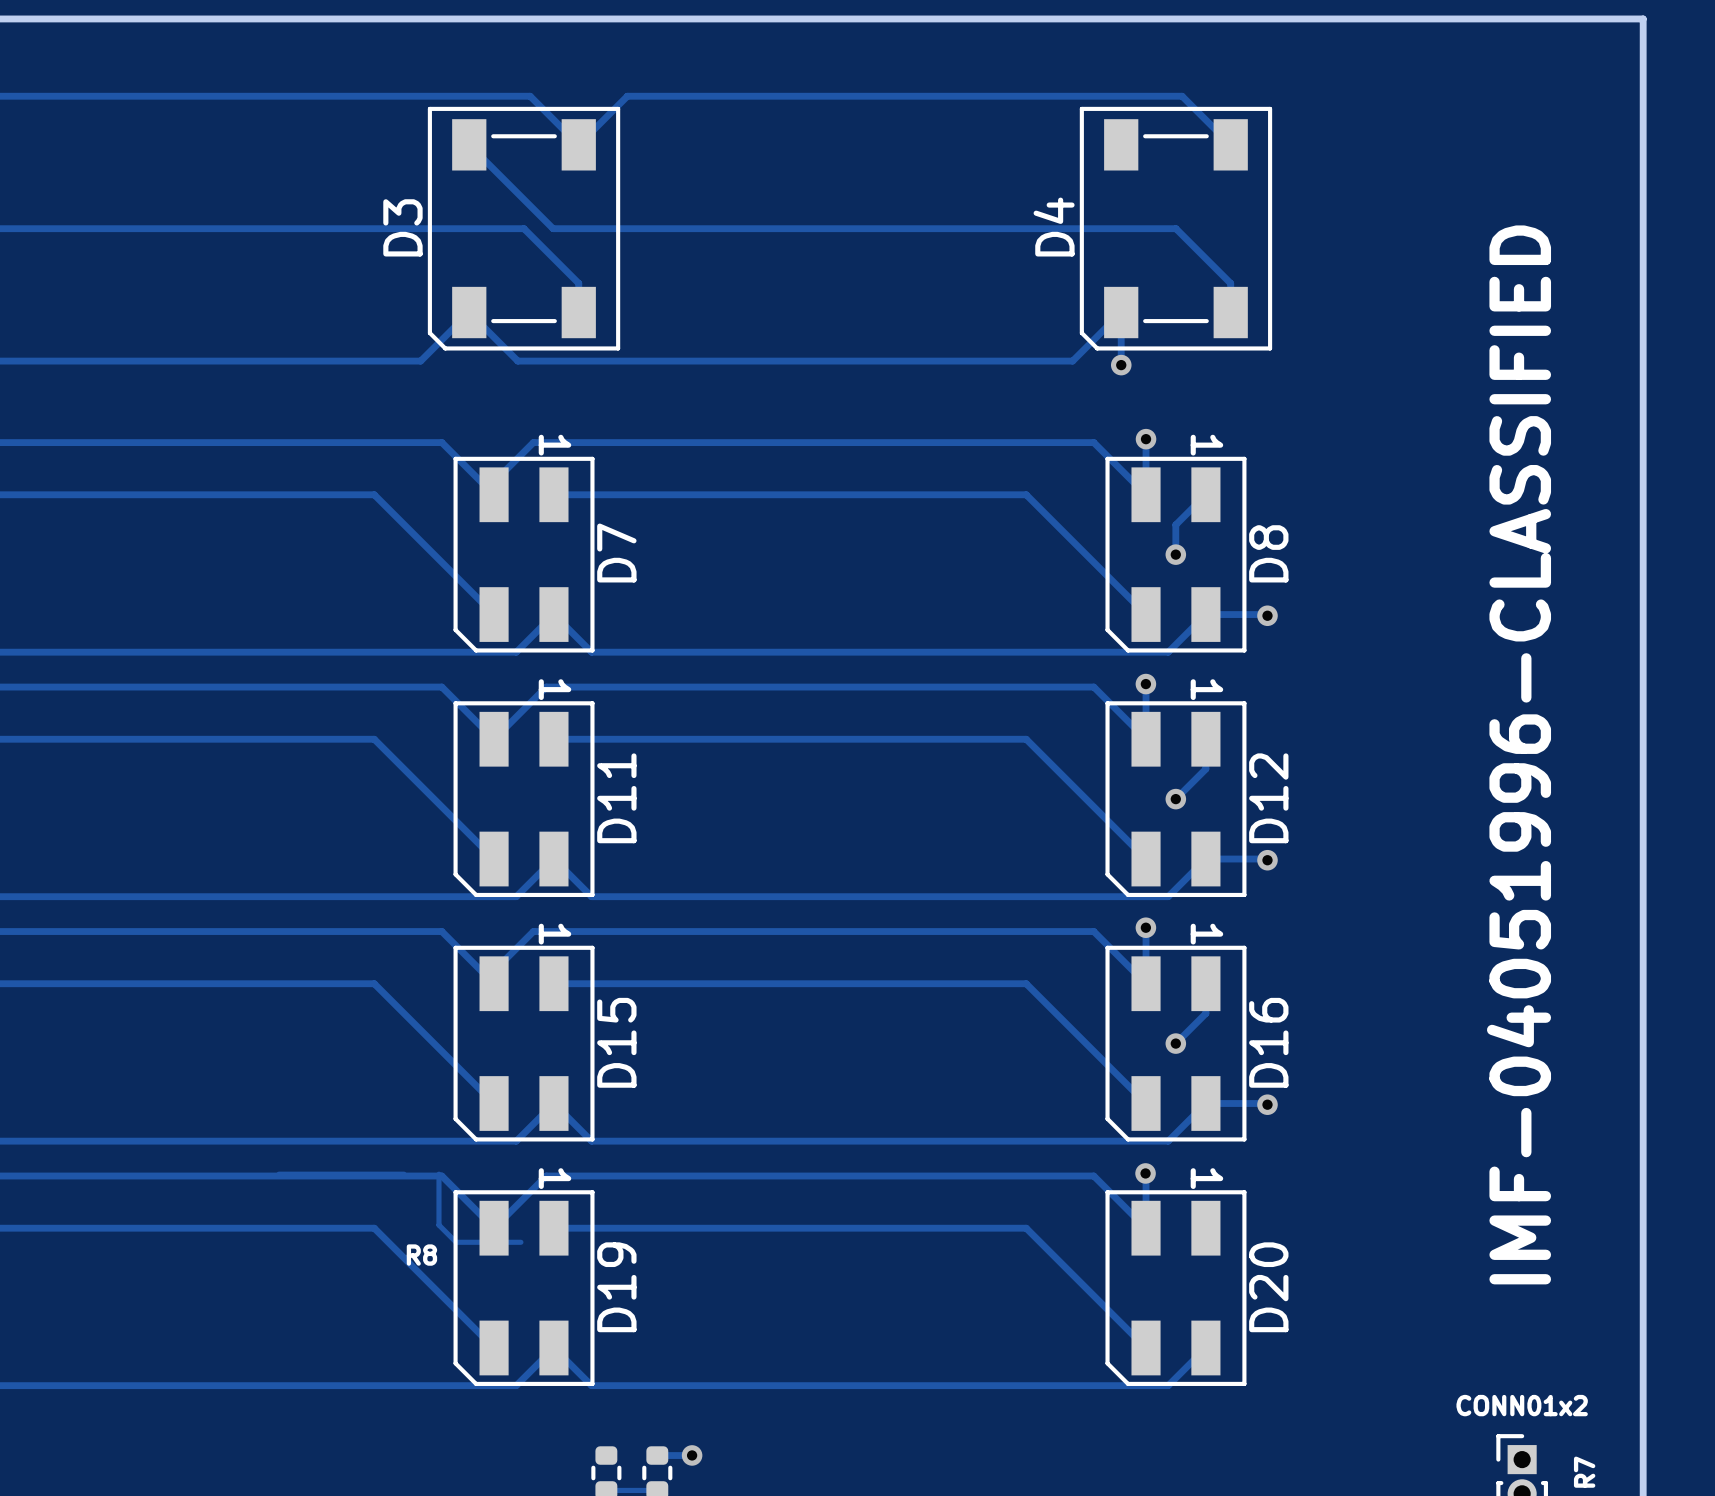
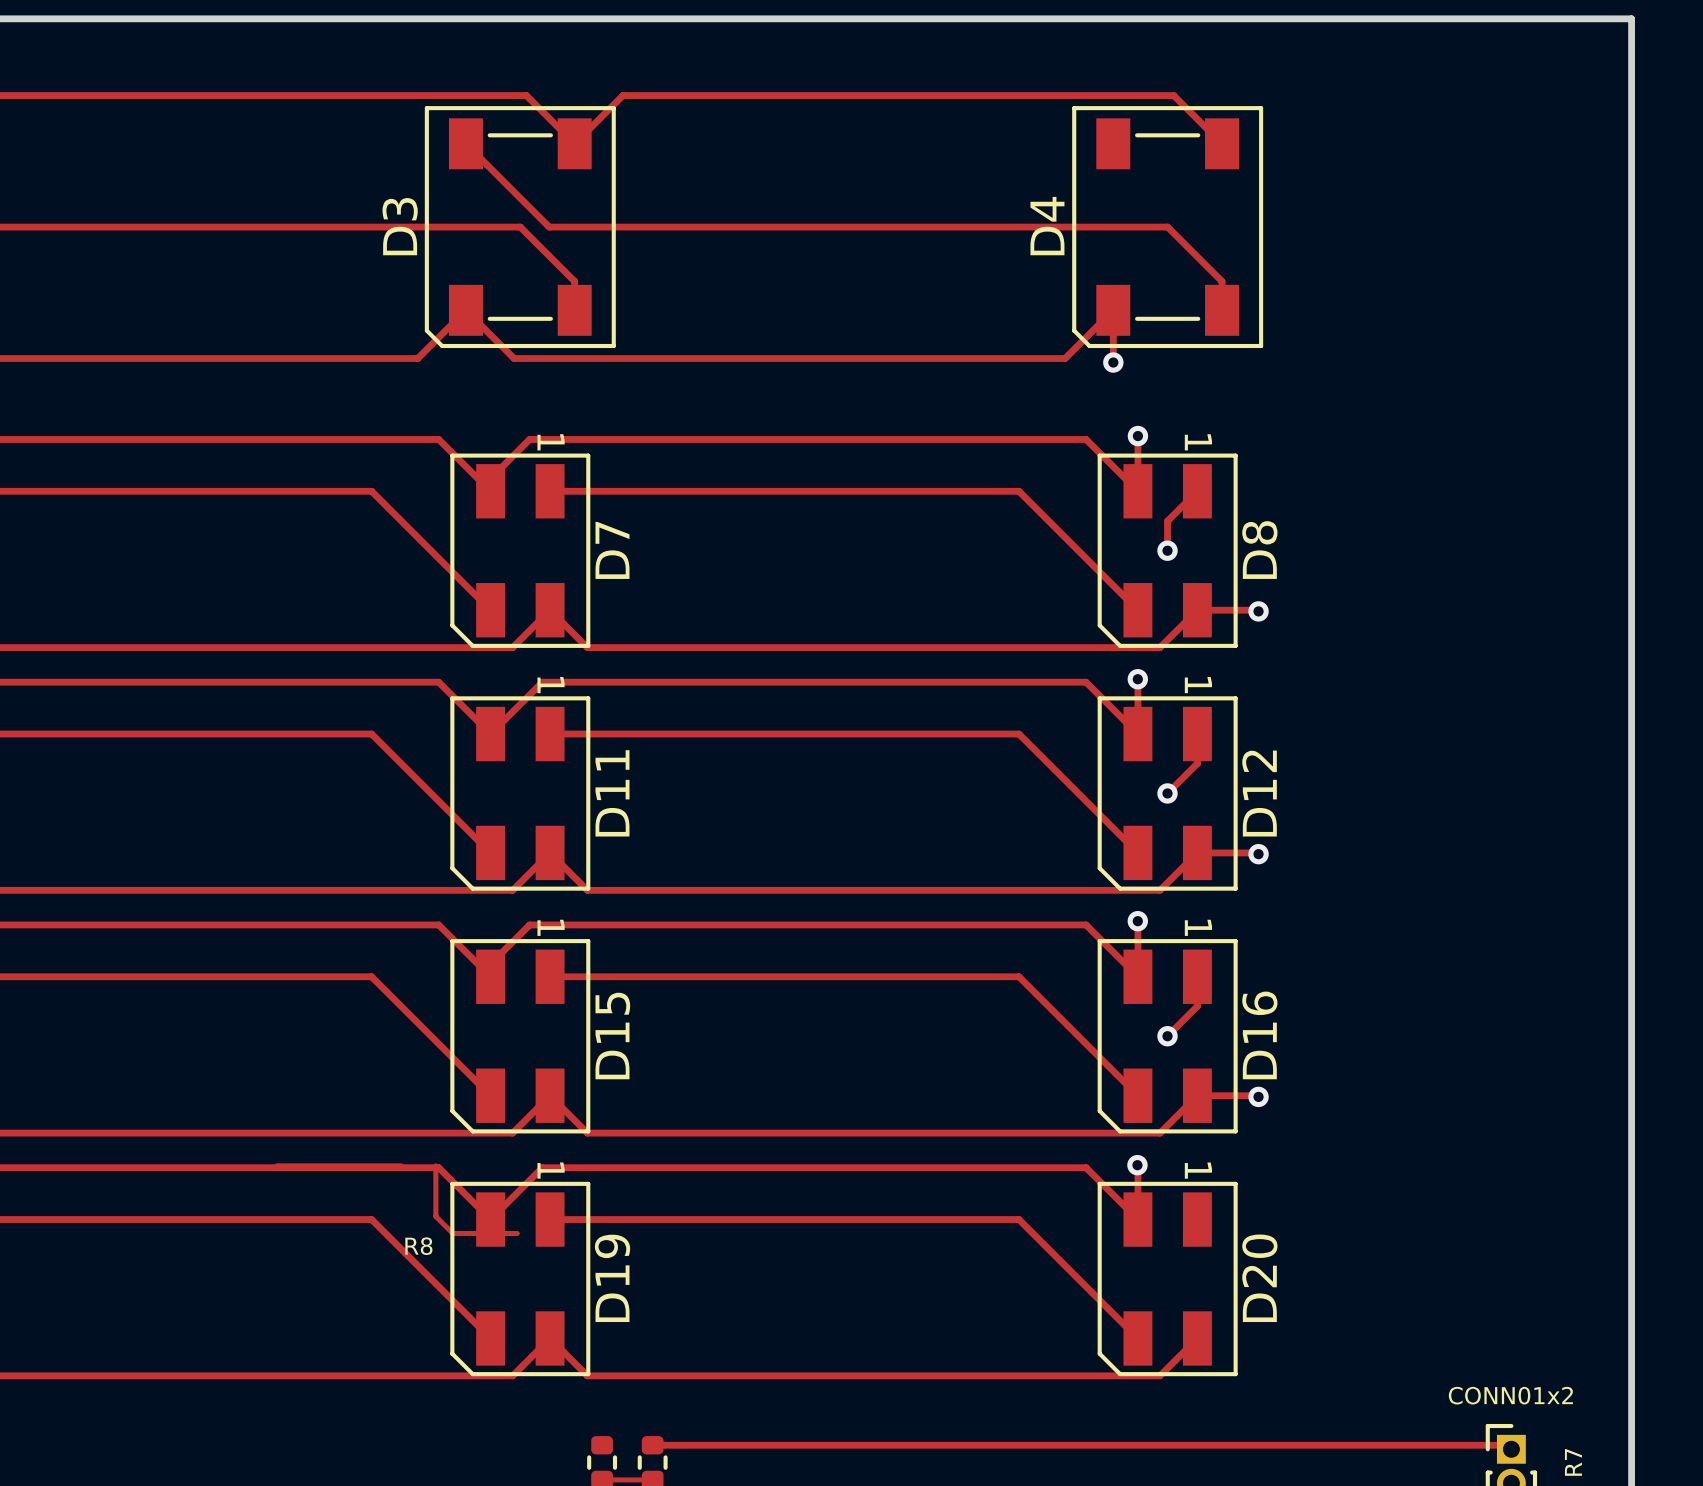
text: IMF-04051996-CLASSIFIED (1519, 754) -> none
track: none -> (687, 1445) (1507, 1445)
via: (692, 1455) -> none

